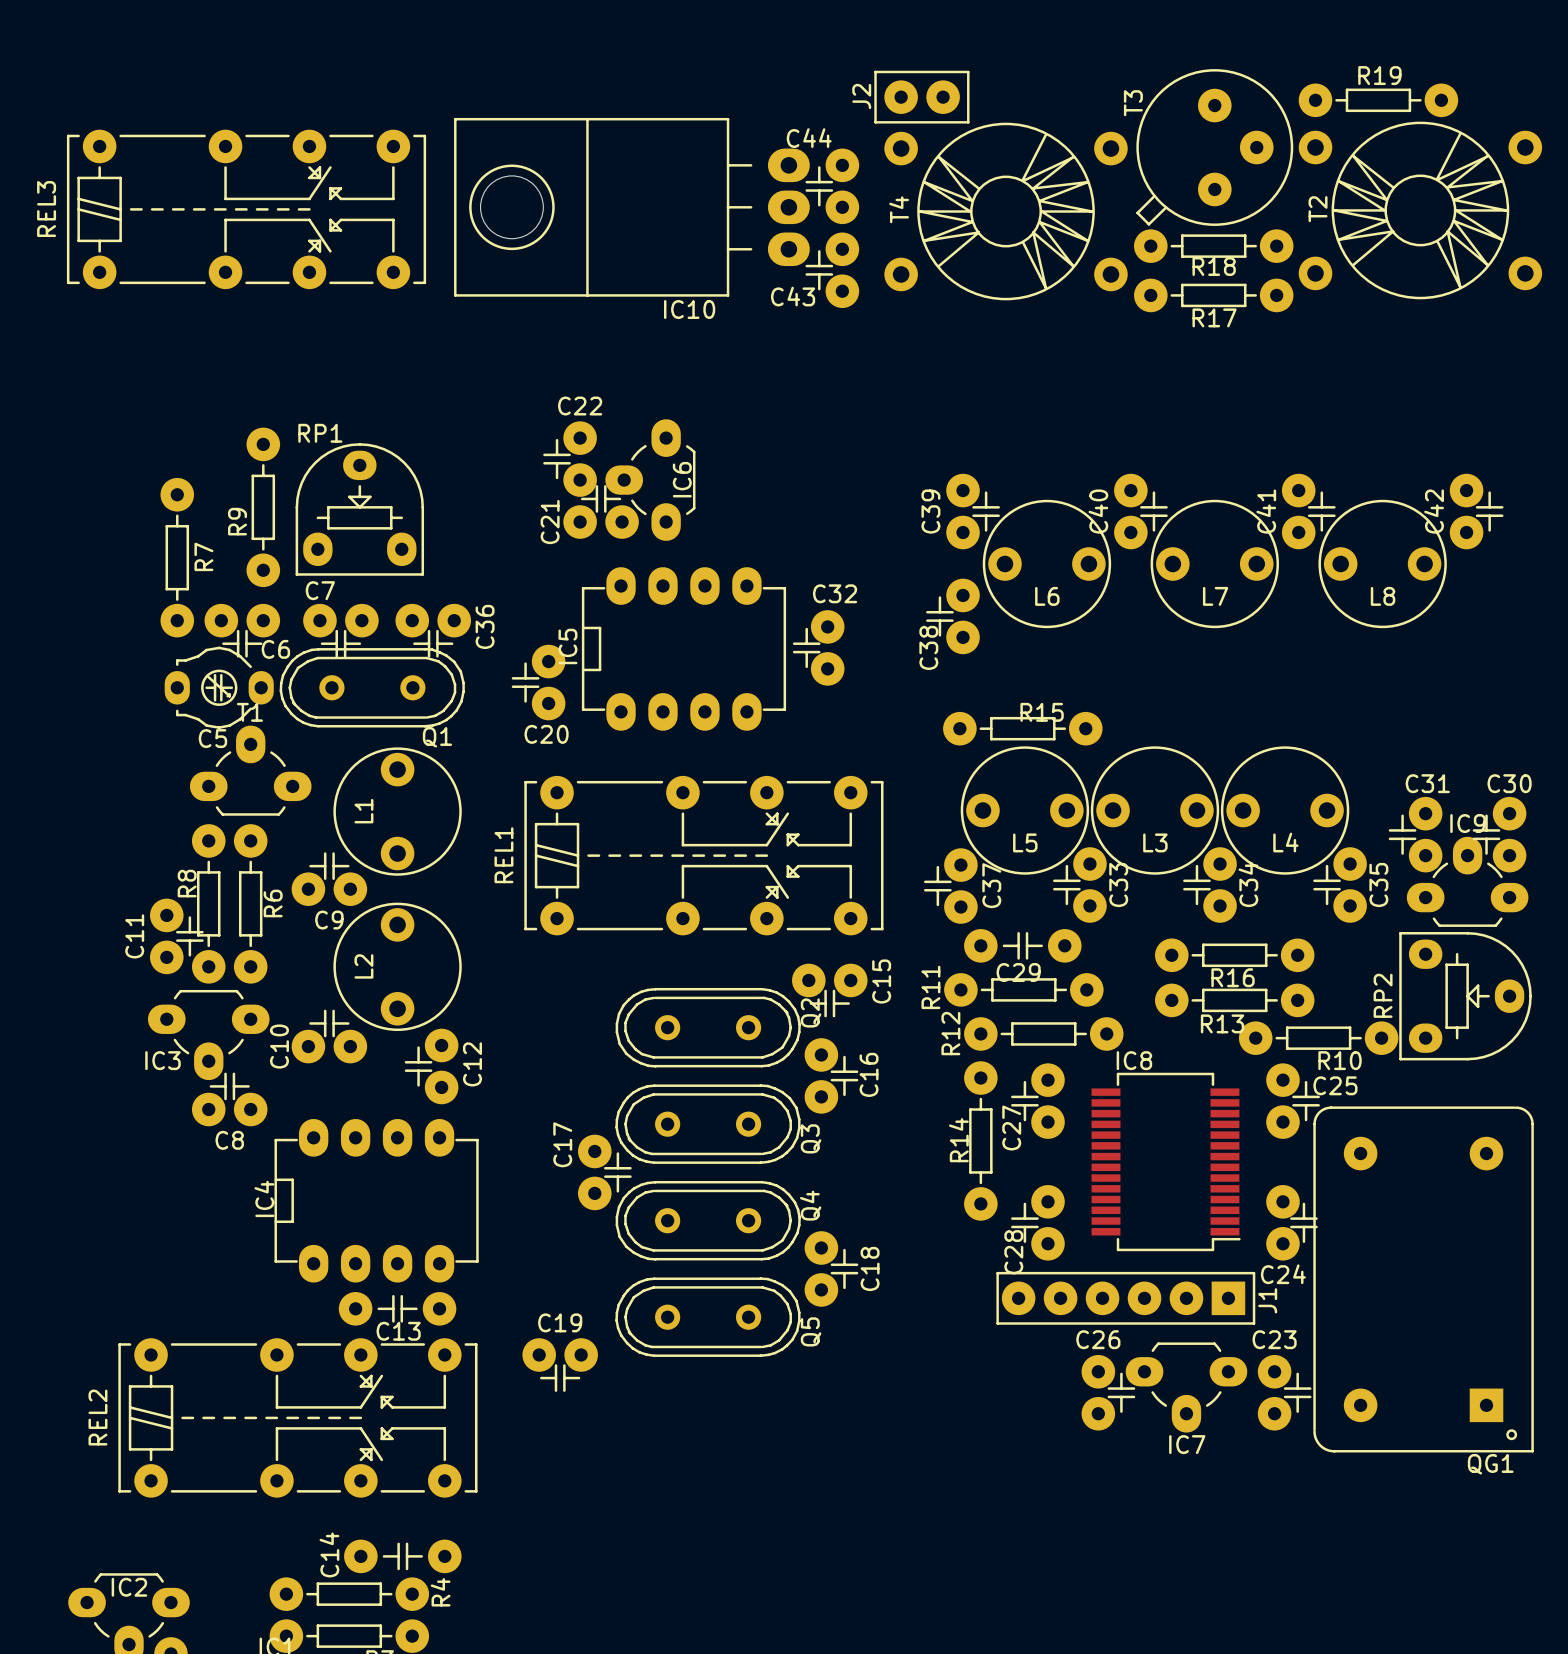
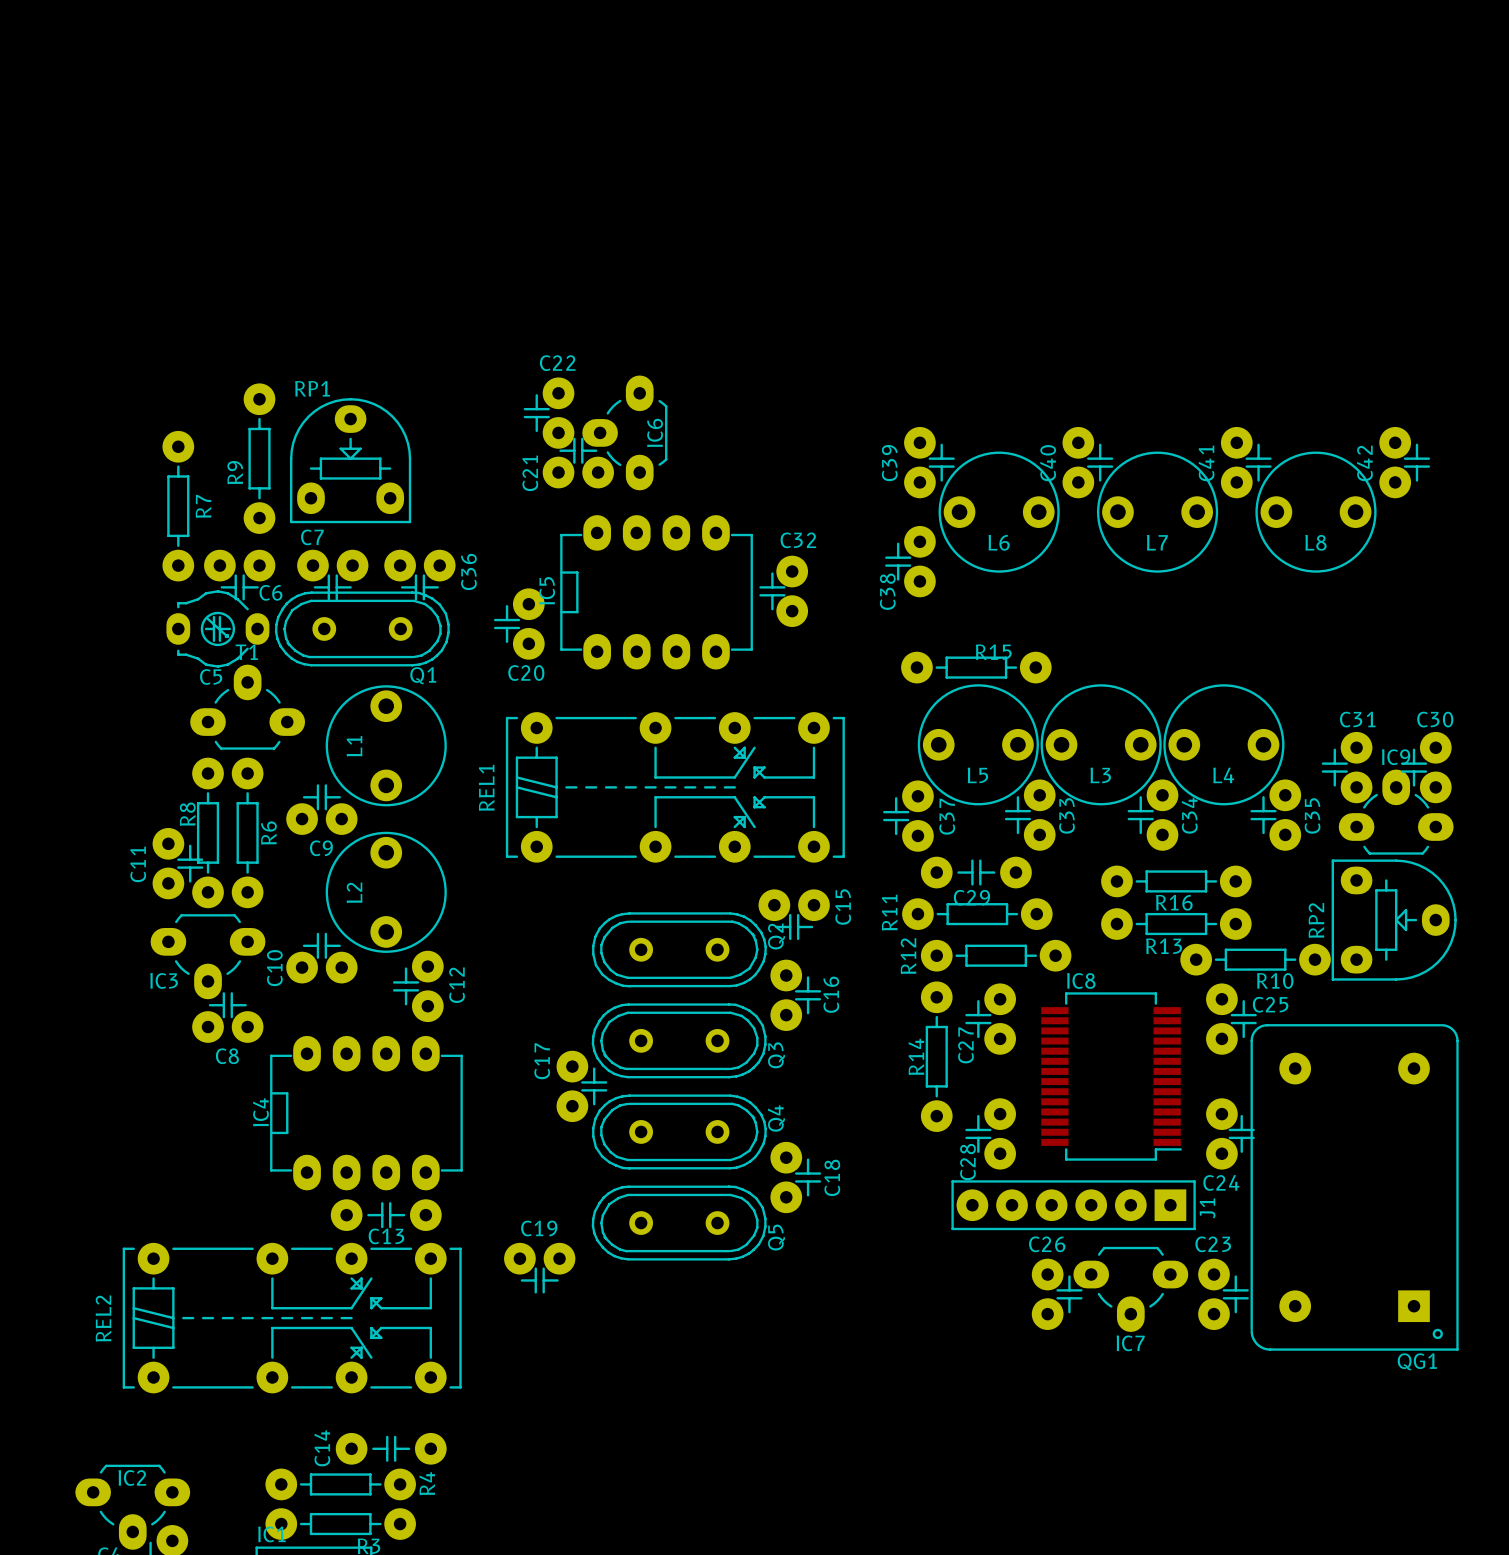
J2: (921, 97) -> none
R19: (1378, 100) -> none
T3: (1214, 147) -> none
C44: (832, 186) -> none
IC10: (631, 207) -> none
REL3: (246, 209) -> none
T2: (1420, 210) -> none
T4: (1006, 211) -> none
R18: (1213, 246) -> none
C43: (832, 270) -> none
R17: (1213, 295) -> none

